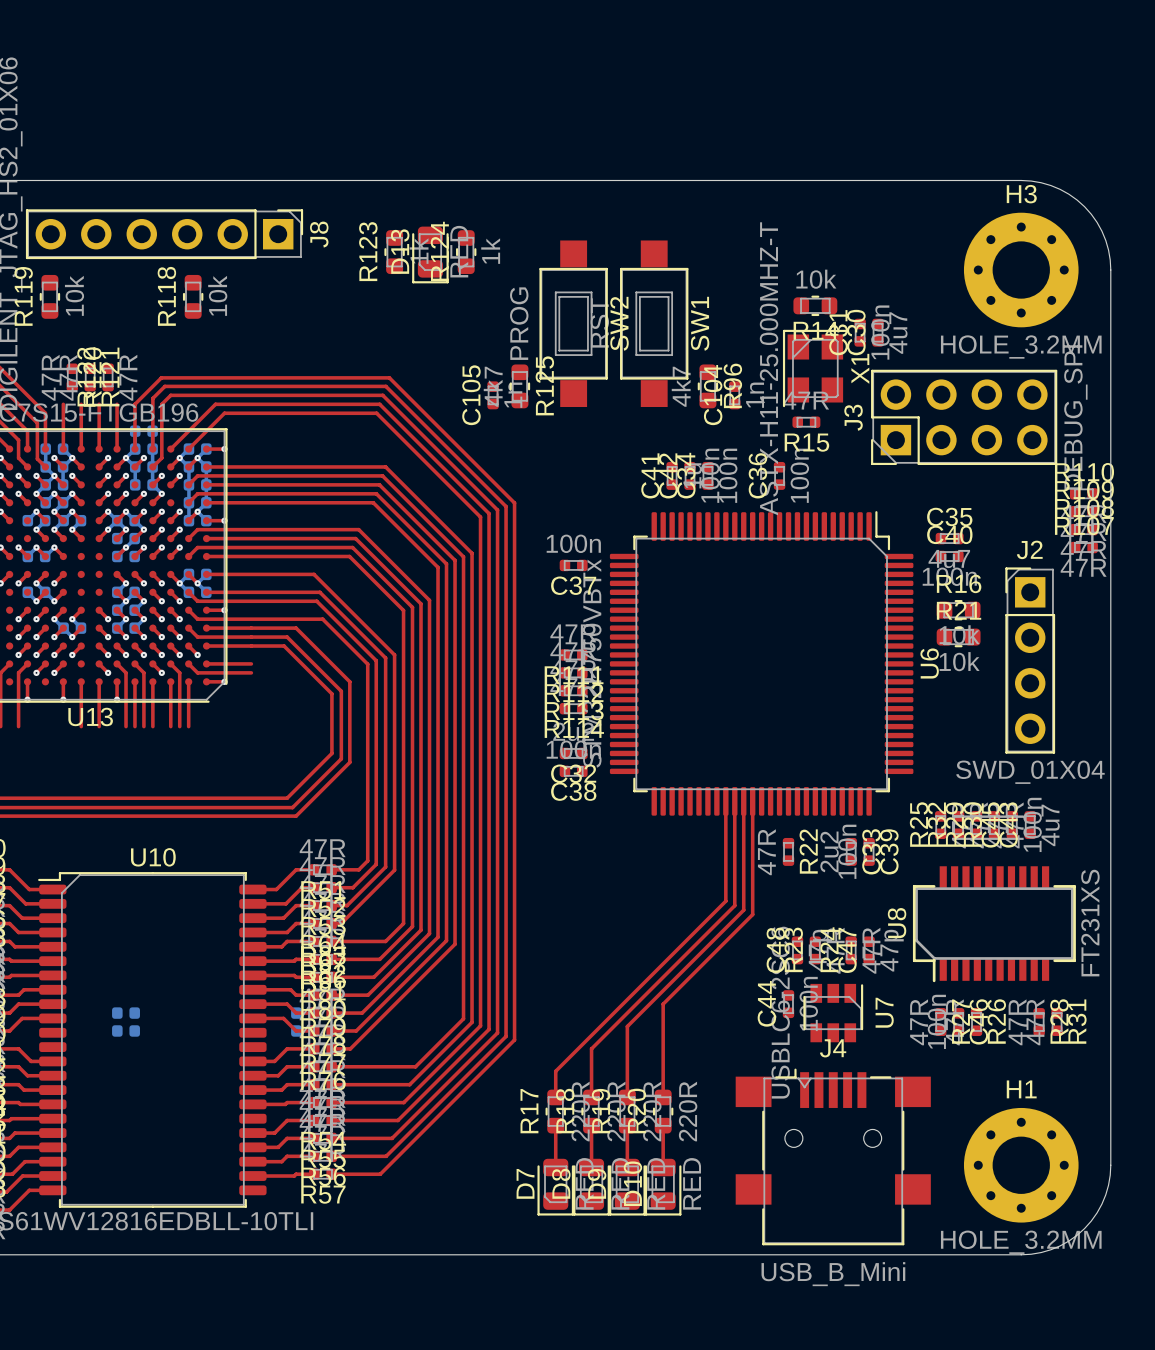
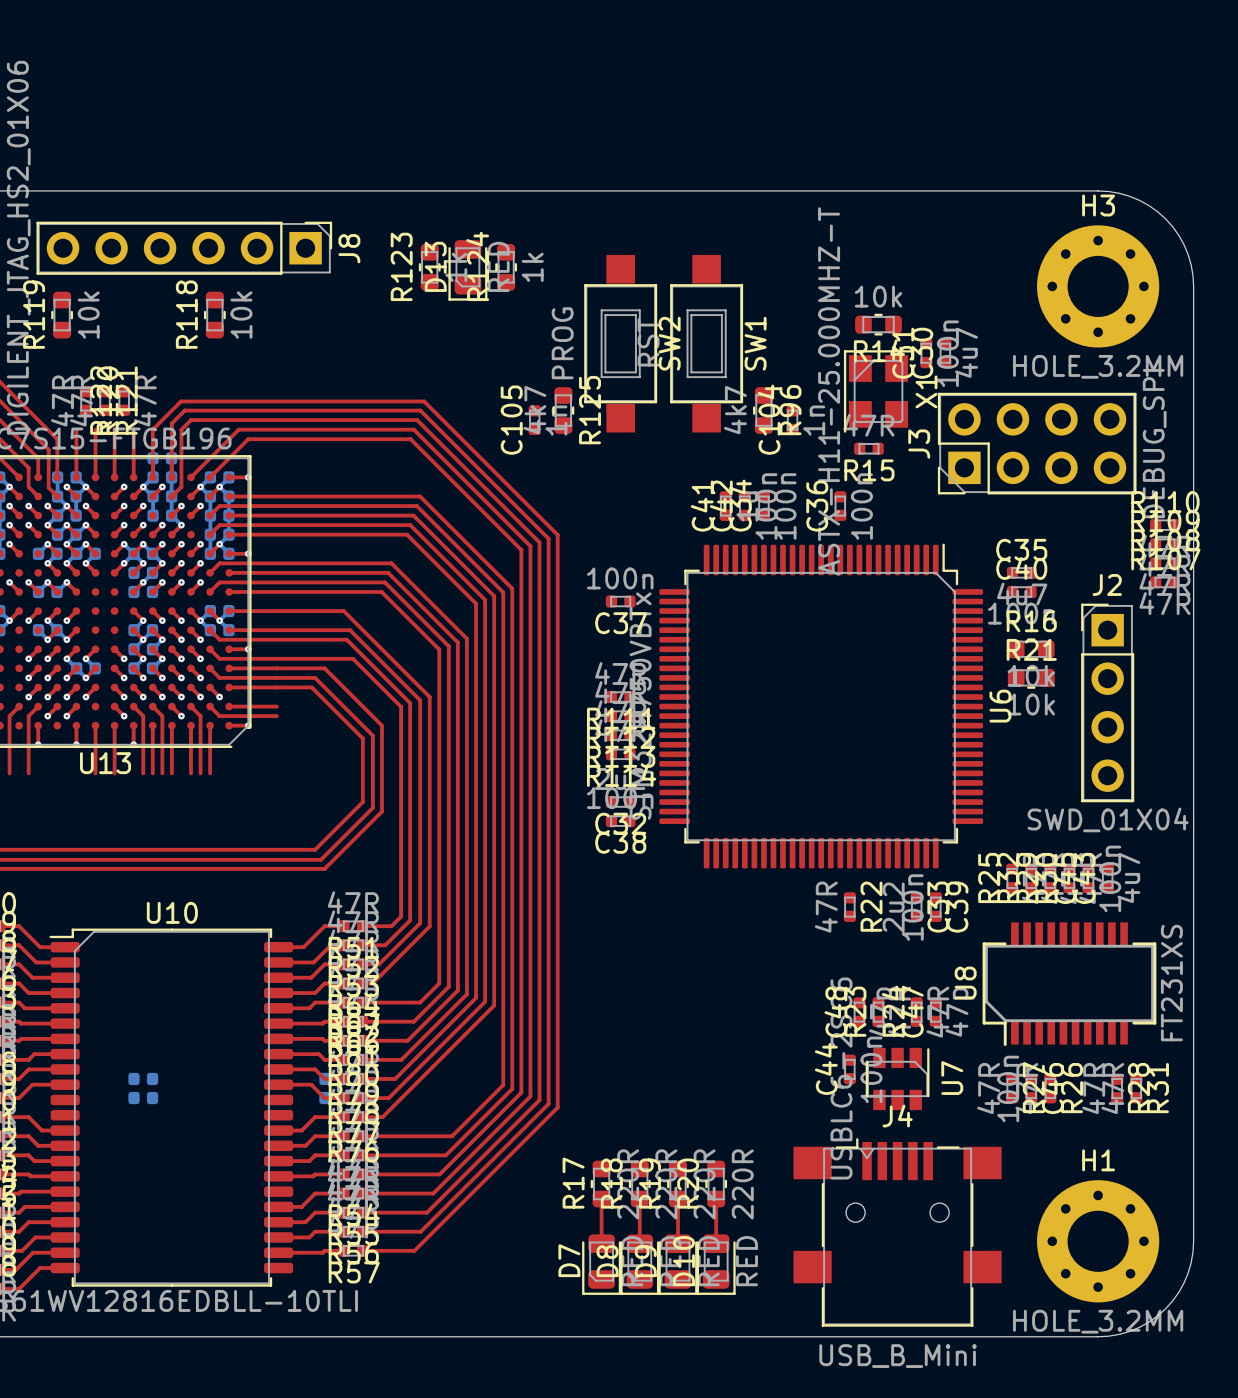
top track: (725, 801) (725, 901) (555, 1071) (555, 1097) -> none
top track: (734, 801) (734, 905) (591, 1048) (591, 1097) -> none
top track: (743, 801) (743, 910) (627, 1026) (627, 1097) -> none
top track: (752, 801) (752, 914) (663, 1004) (663, 1097) -> none

